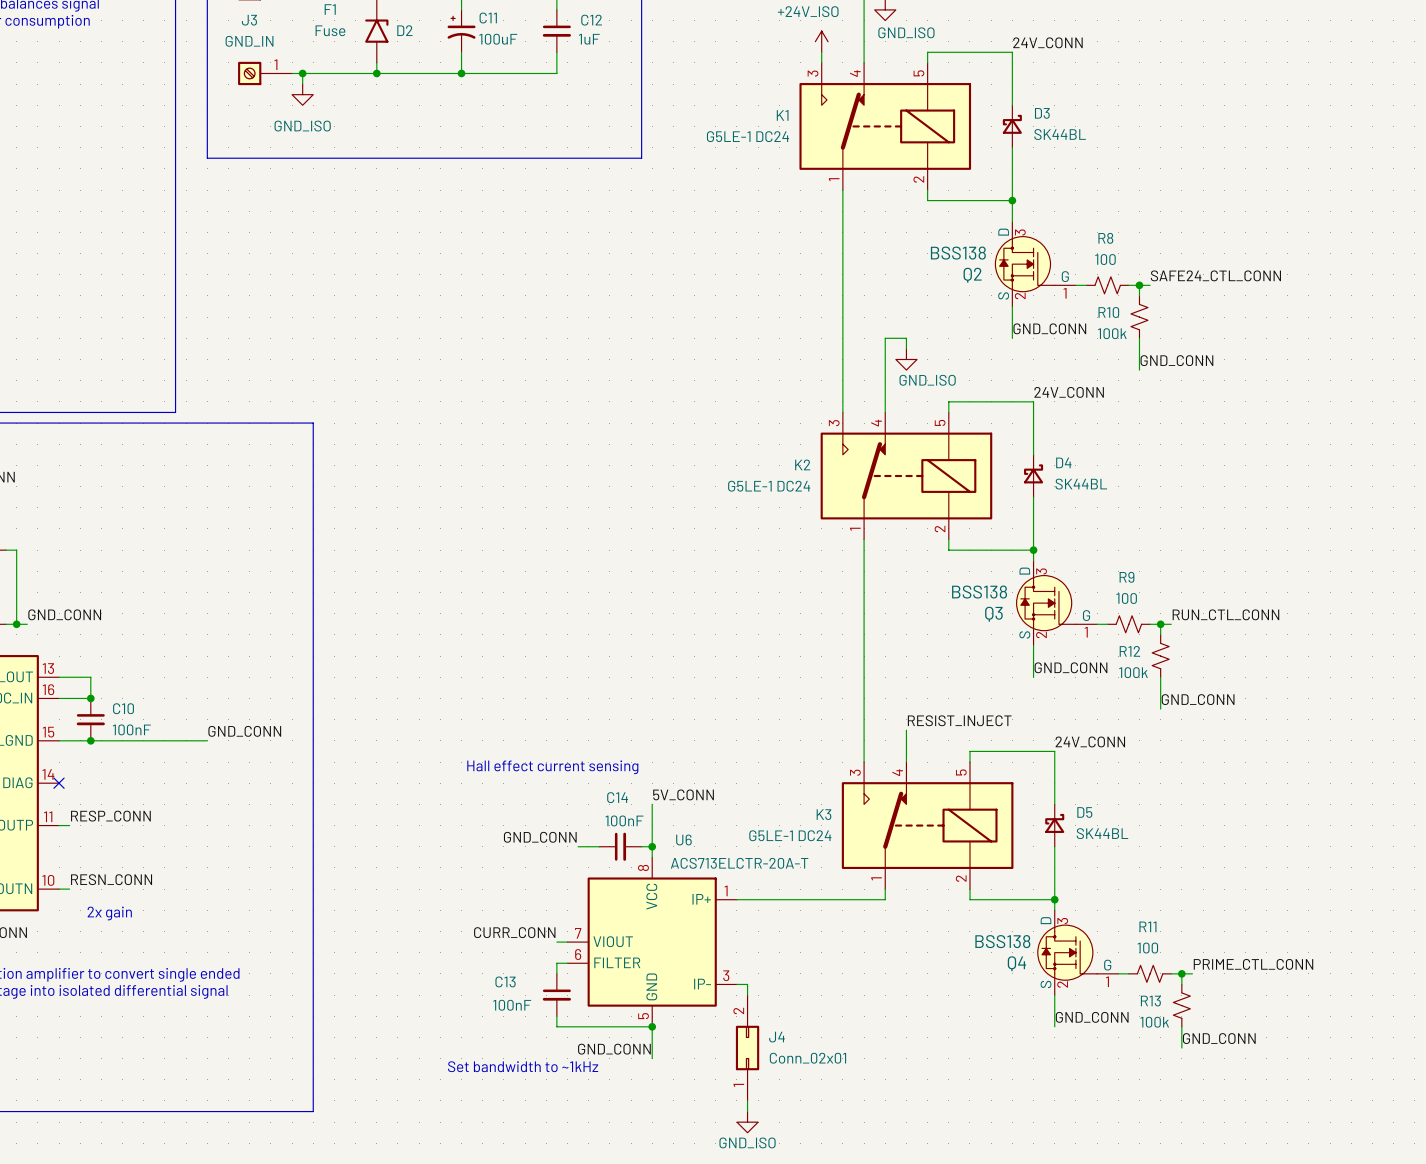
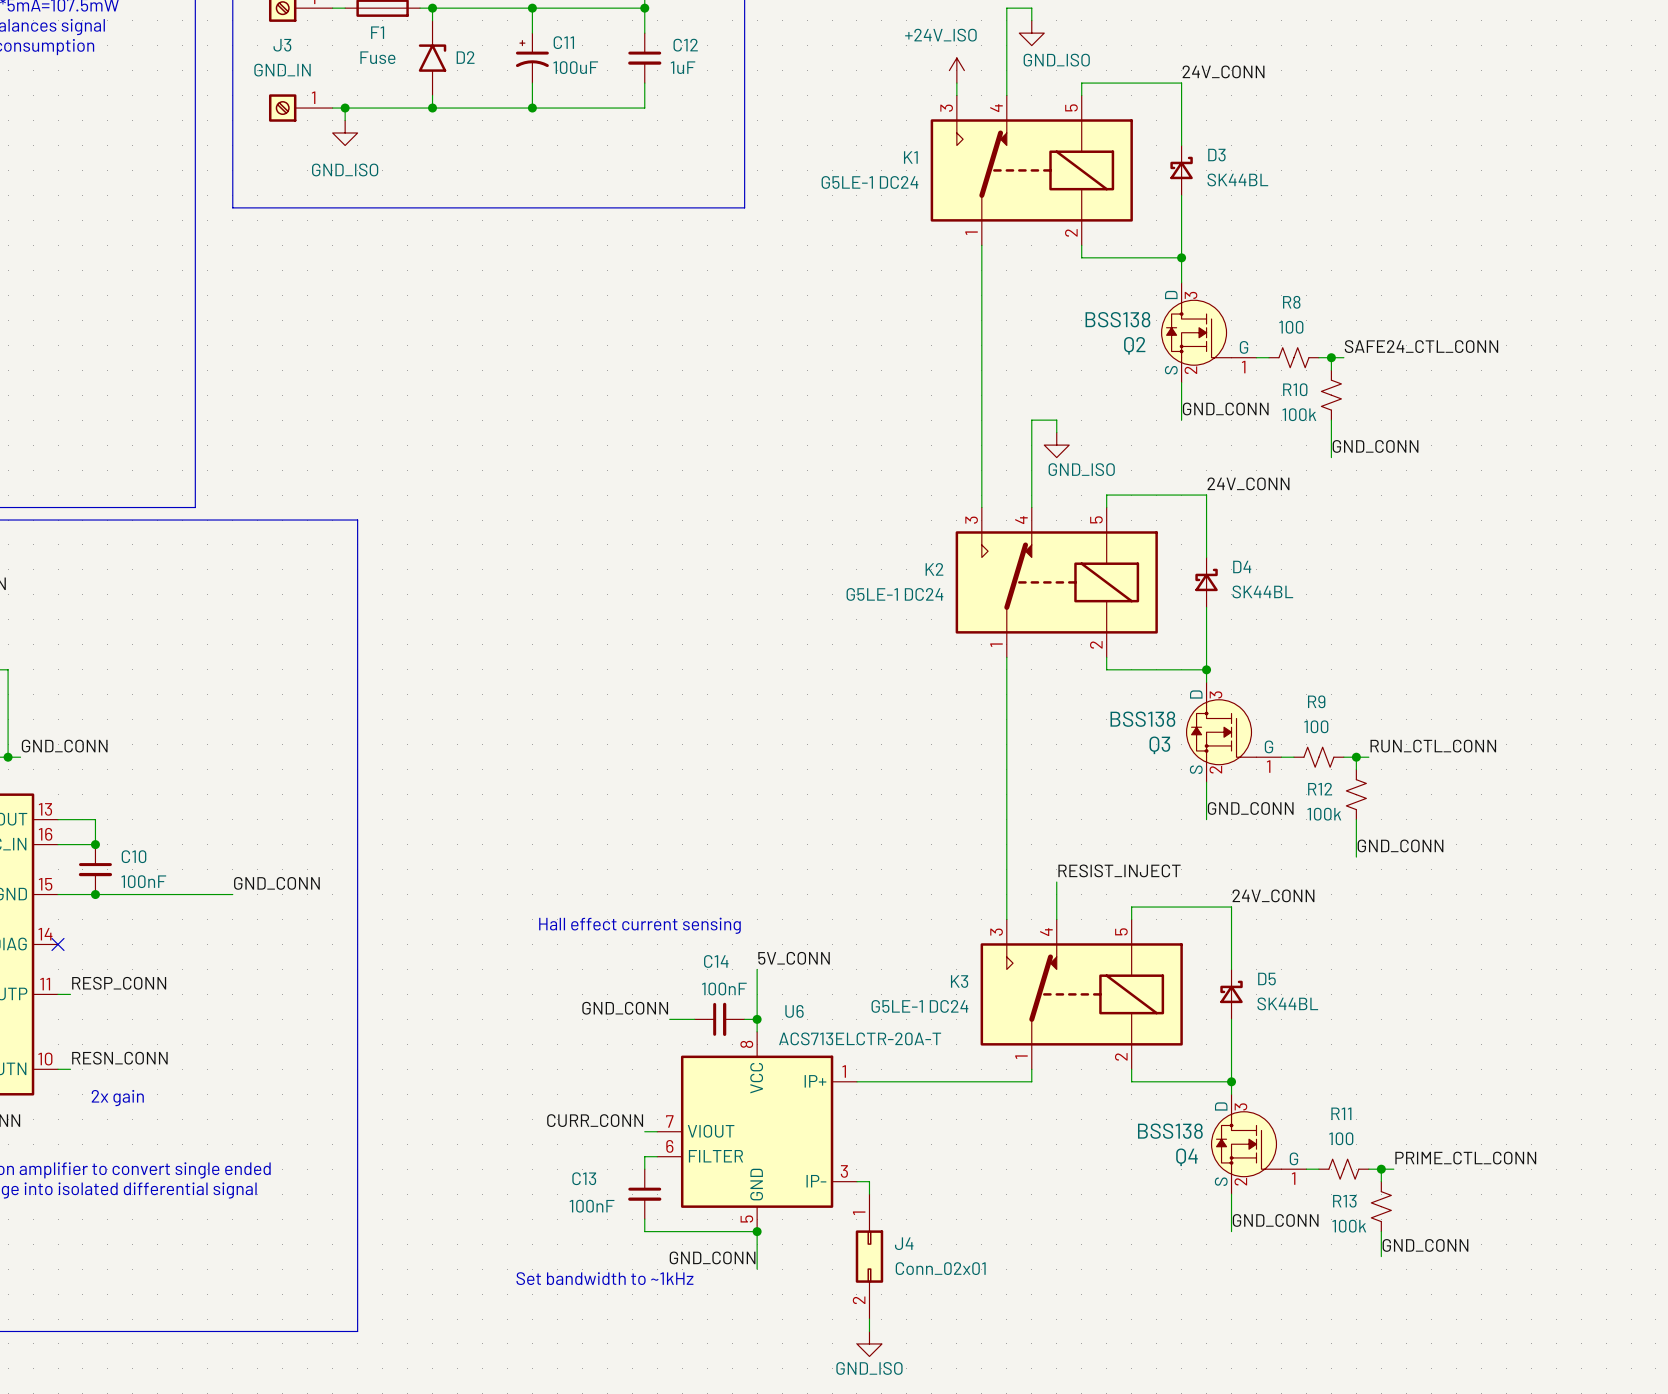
J4 rotation: 0° (747, 1048) -> 180° (869, 1256)

